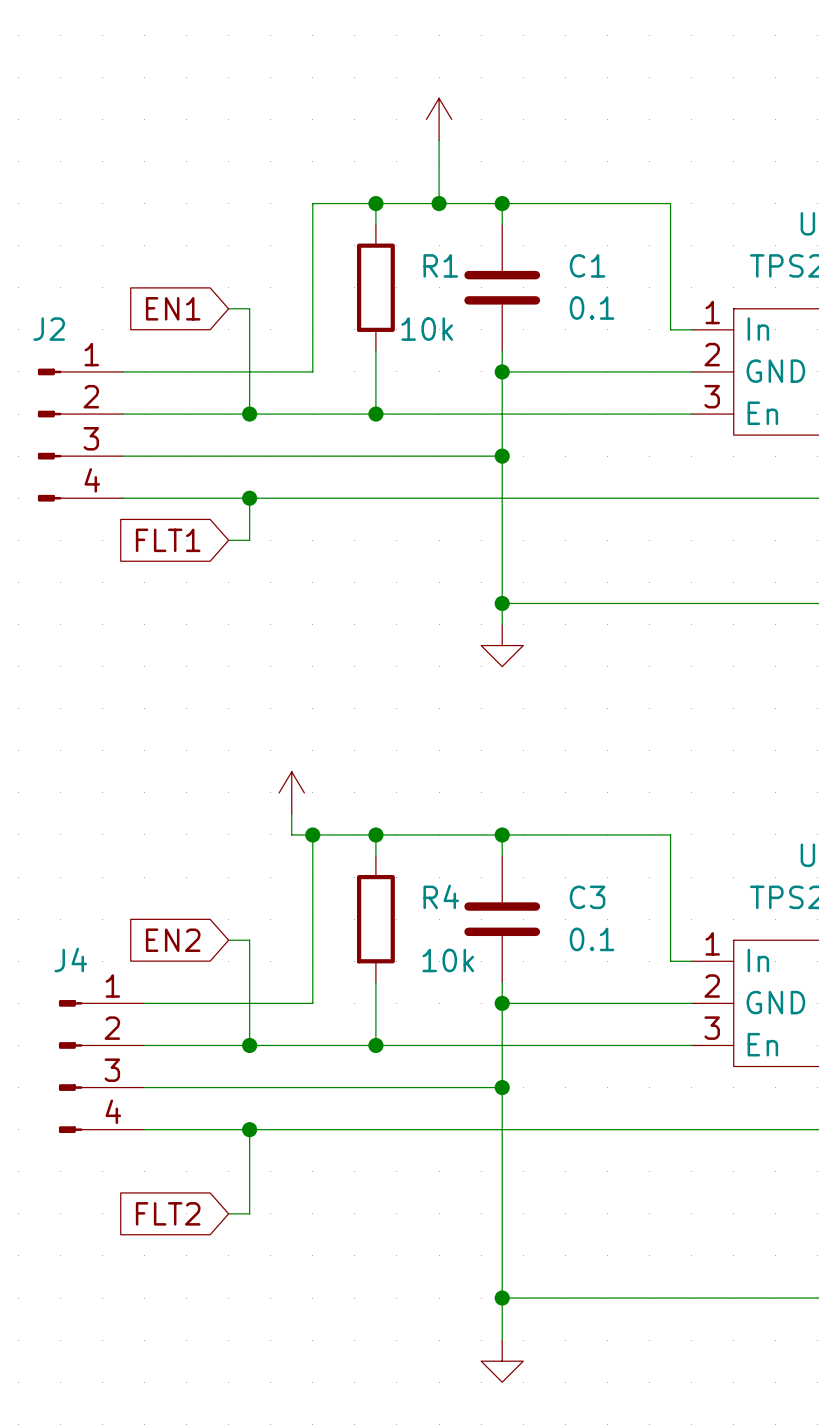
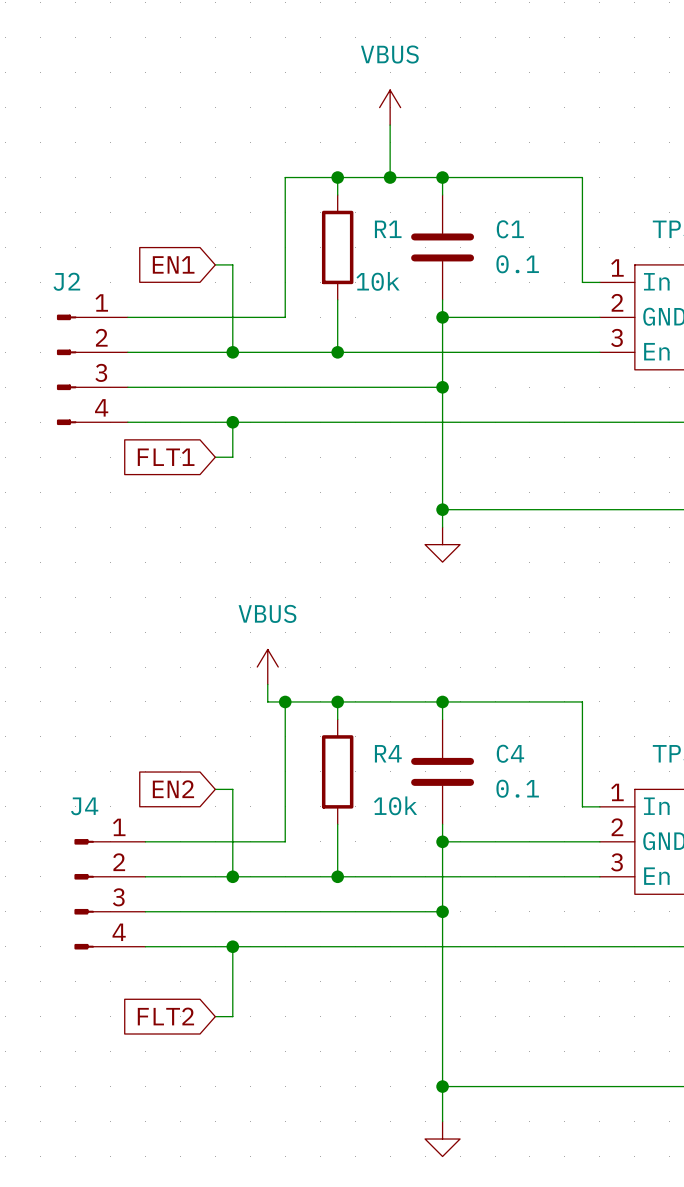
power symbol text: none -> VBUS (389, 54)
power symbol text: none -> VBUS (267, 613)
C3 name: C3 (587, 897) -> C4 (510, 753)

